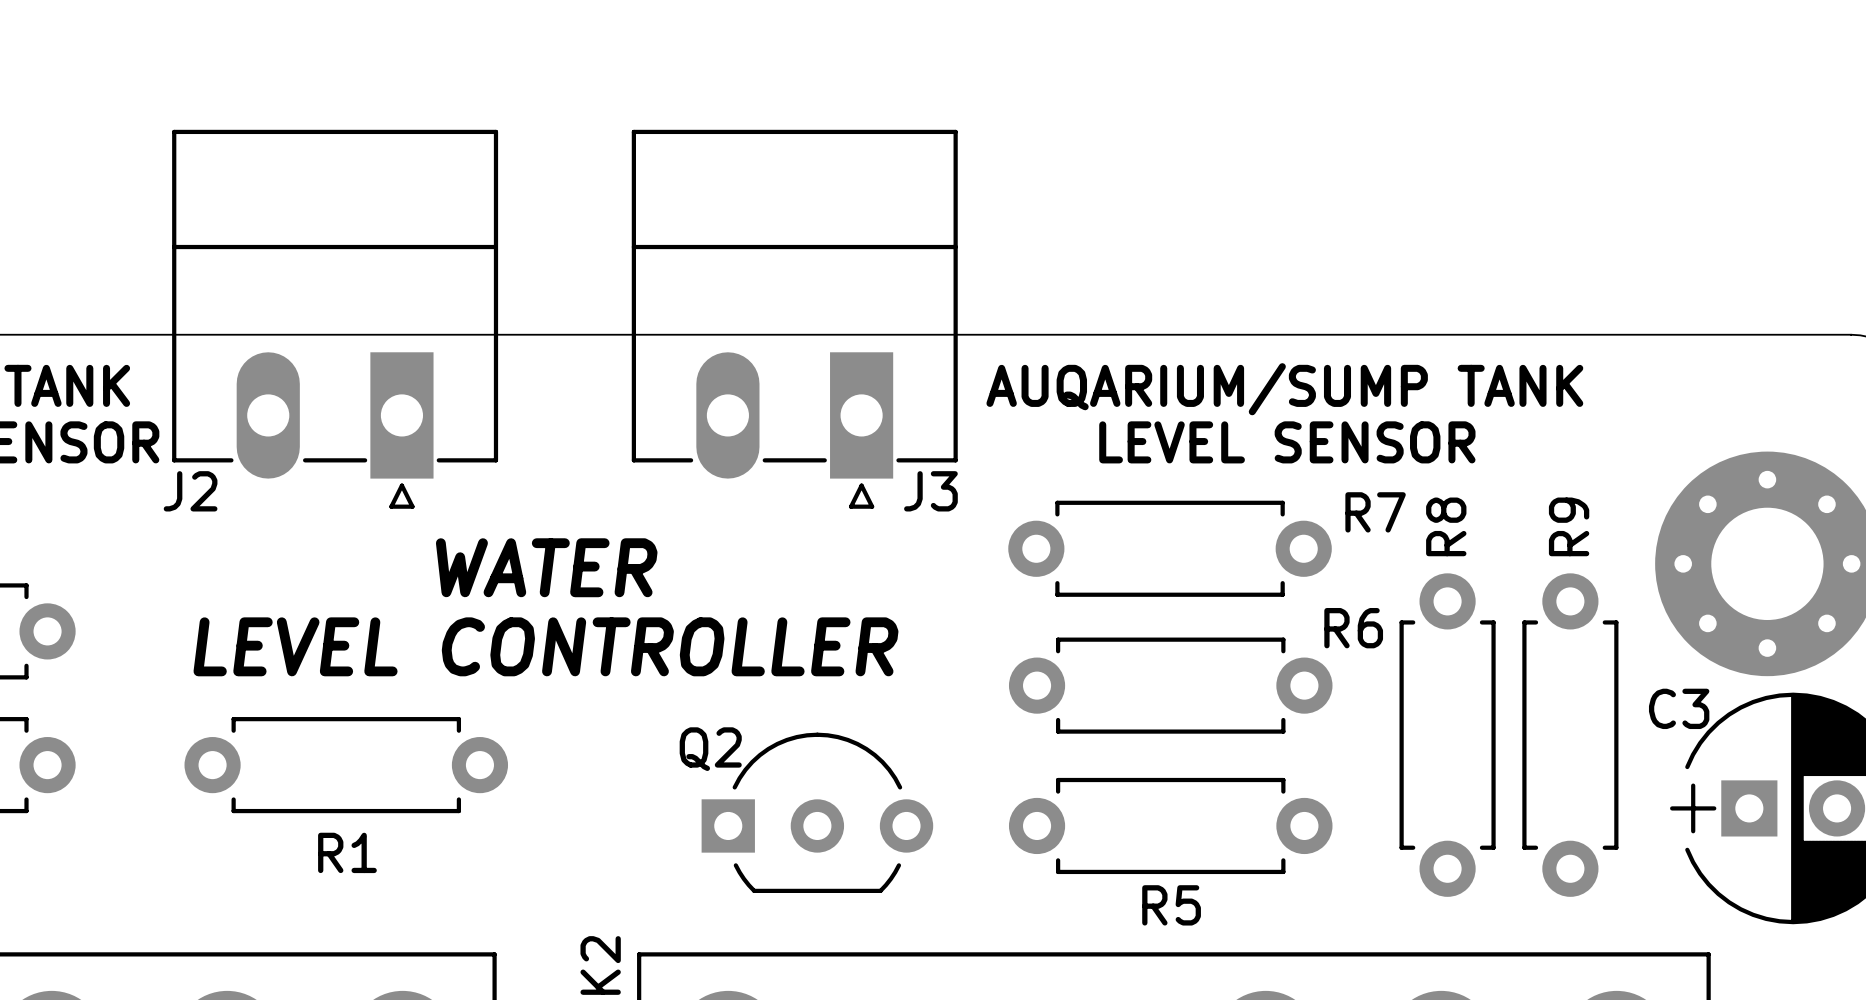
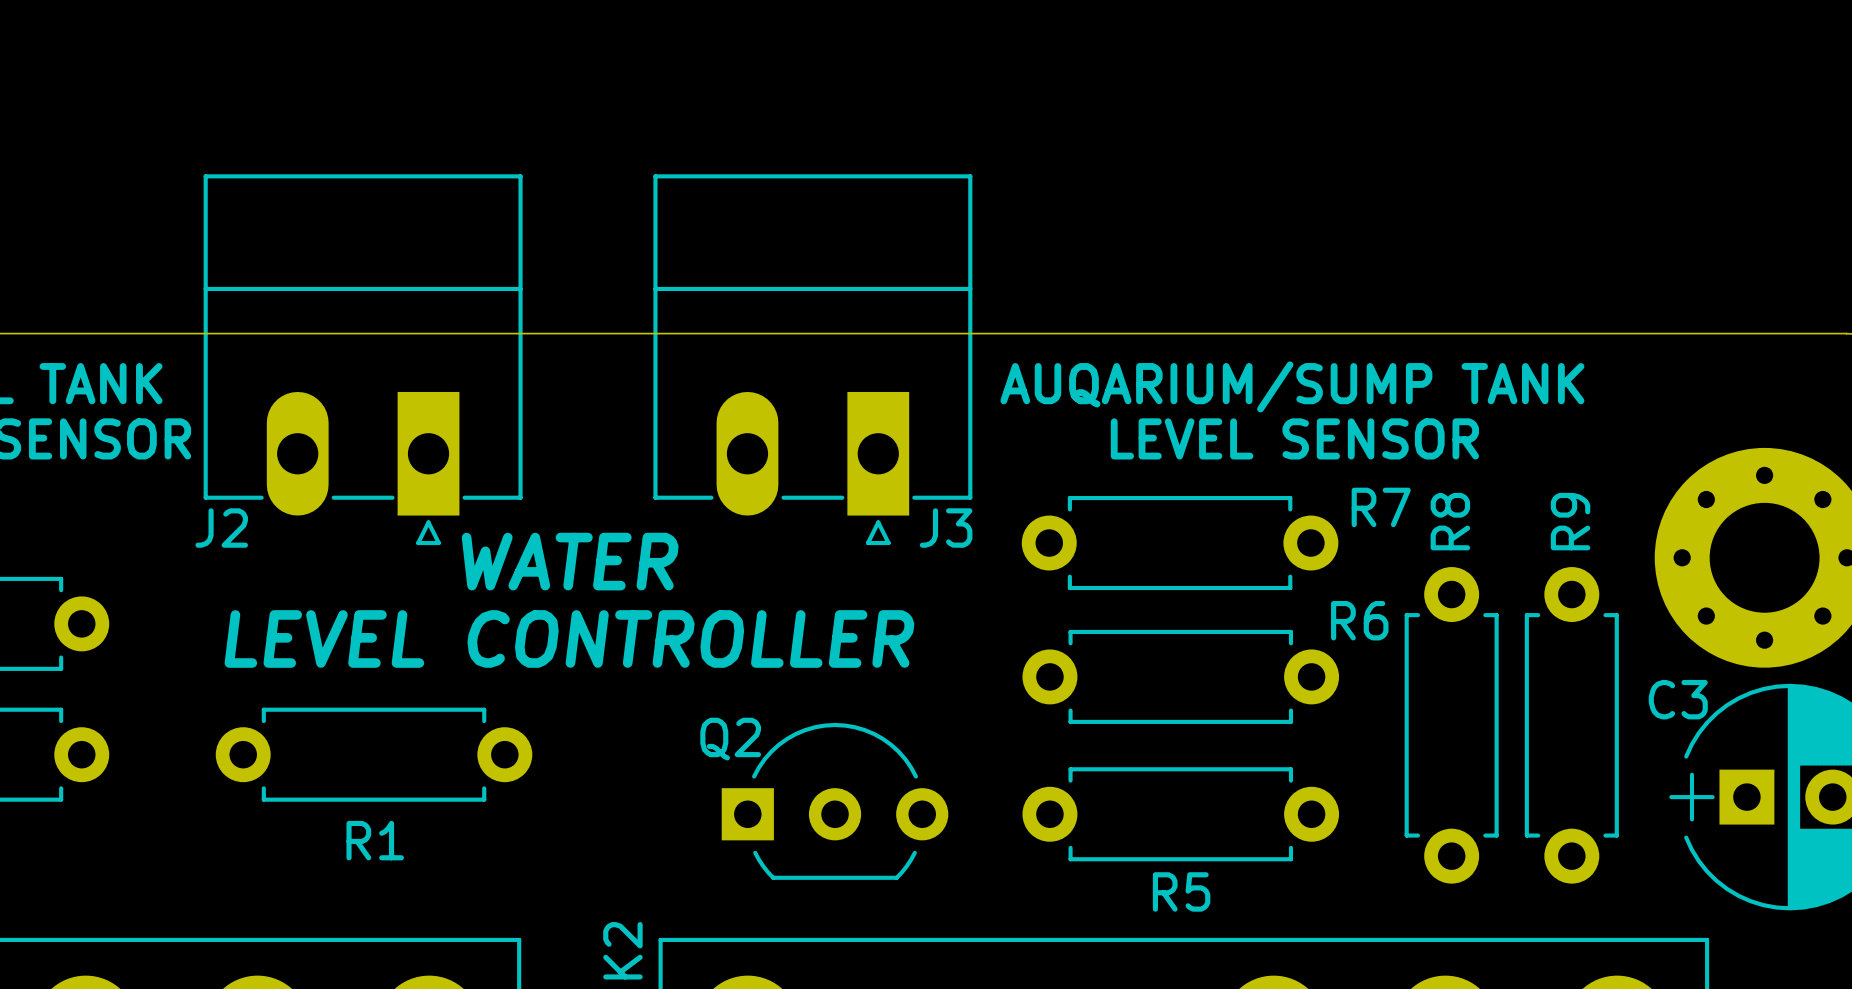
J2 position: (335, 319) -> (363, 359)
J3 position: (794, 319) -> (812, 359)

